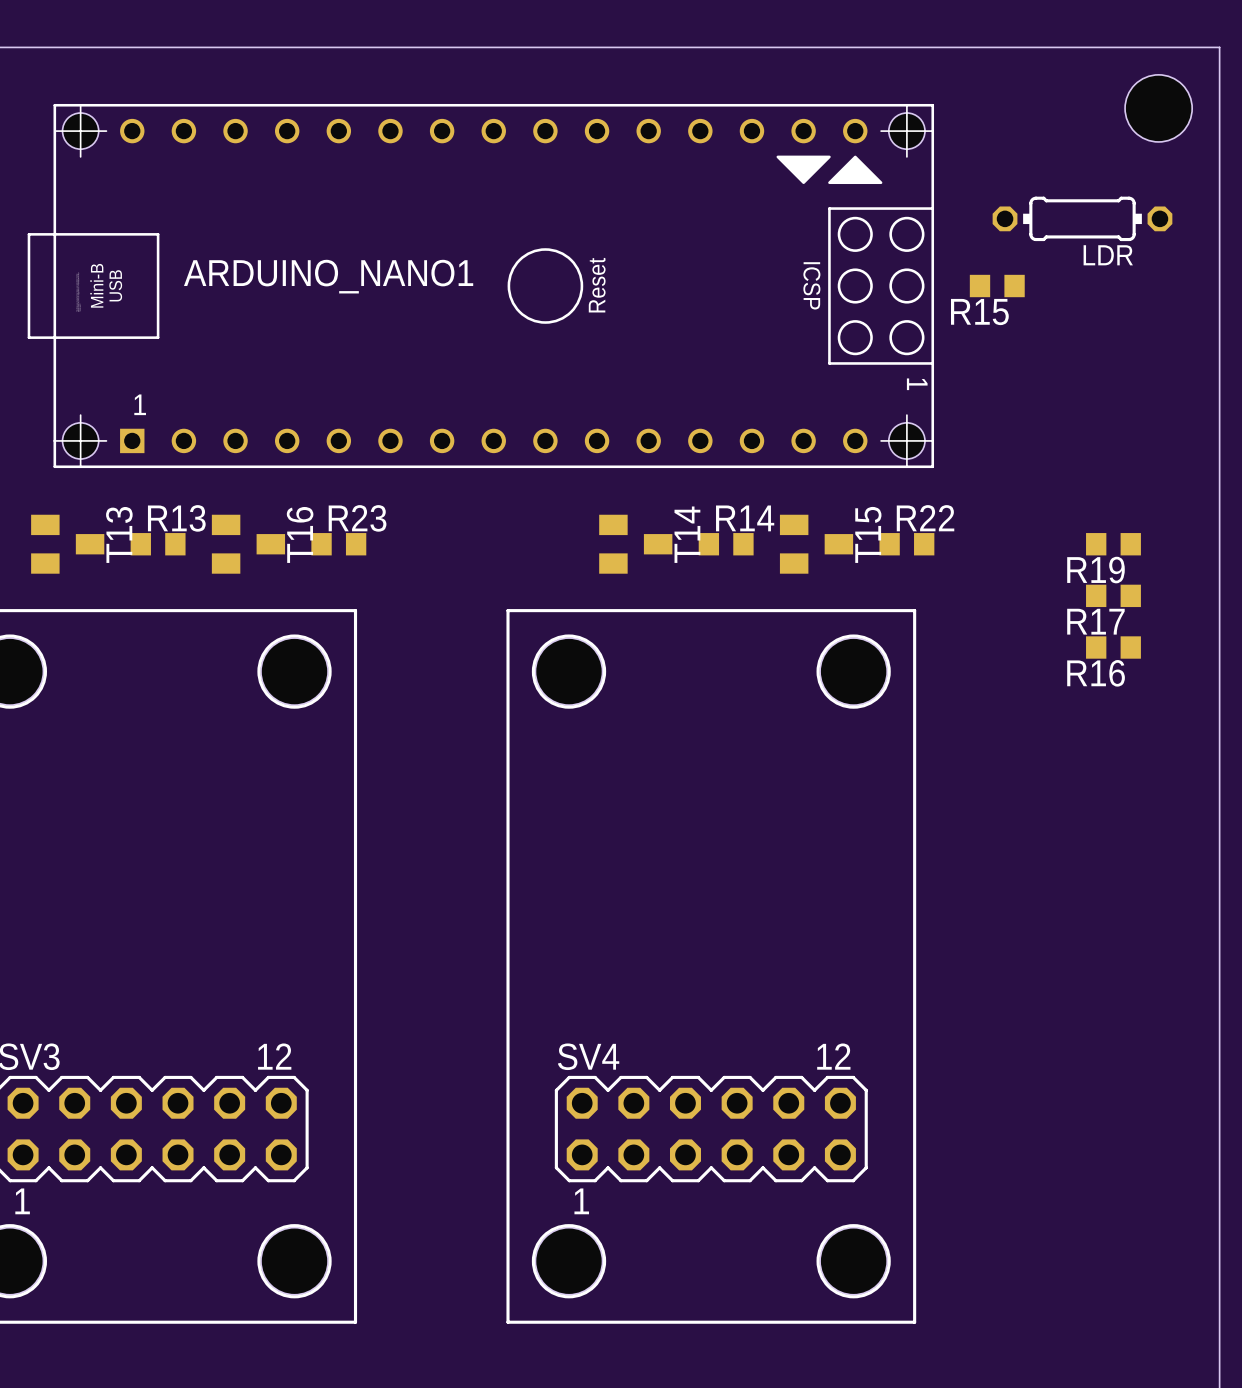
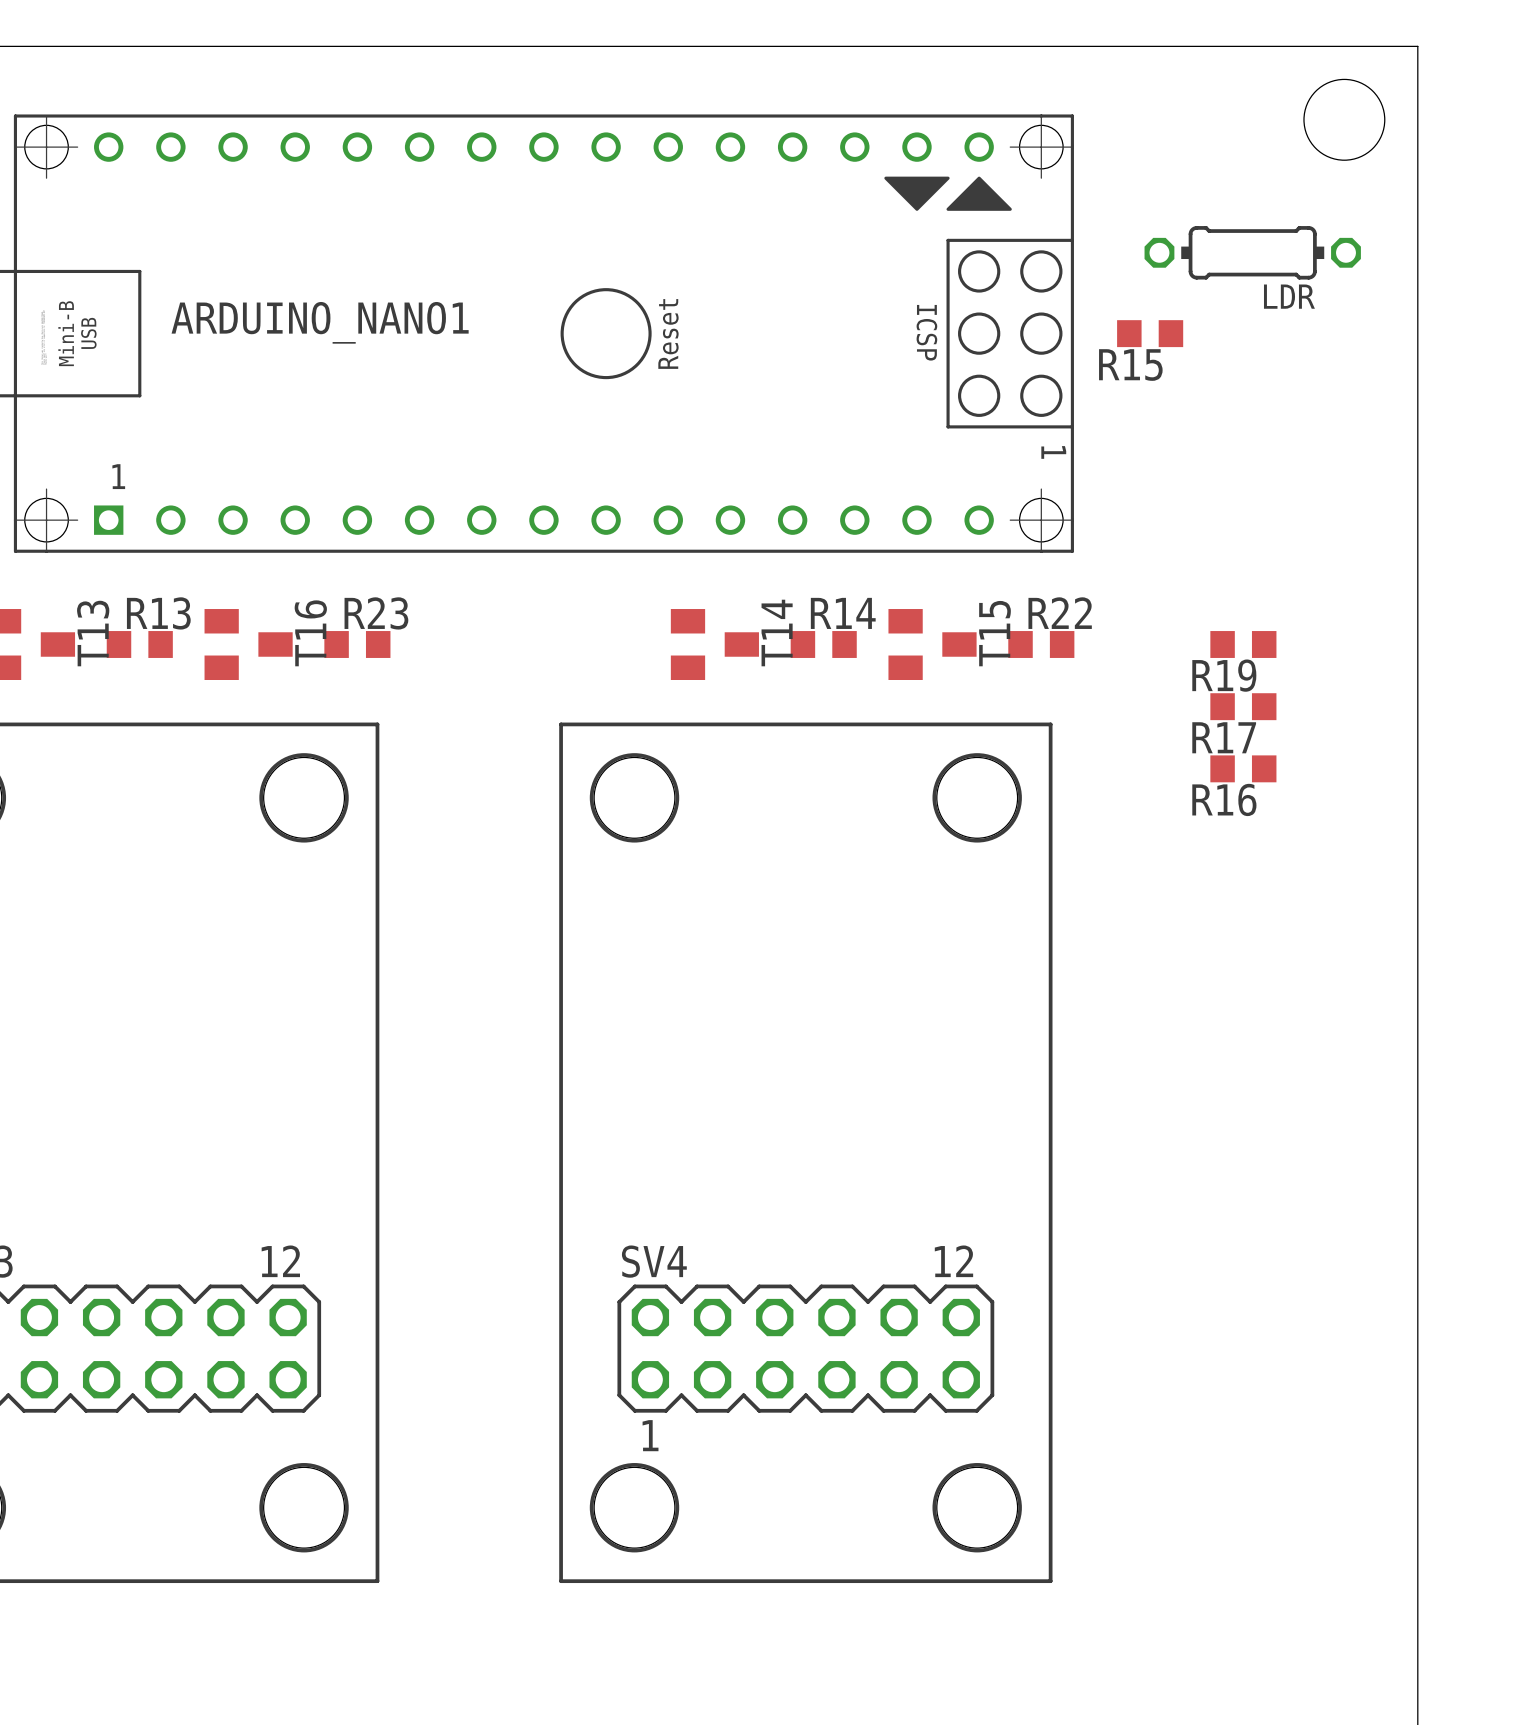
R19 position: (1113, 544) -> (1243, 644)
R17 position: (1113, 595) -> (1243, 706)
R16 position: (1113, 647) -> (1243, 768)

